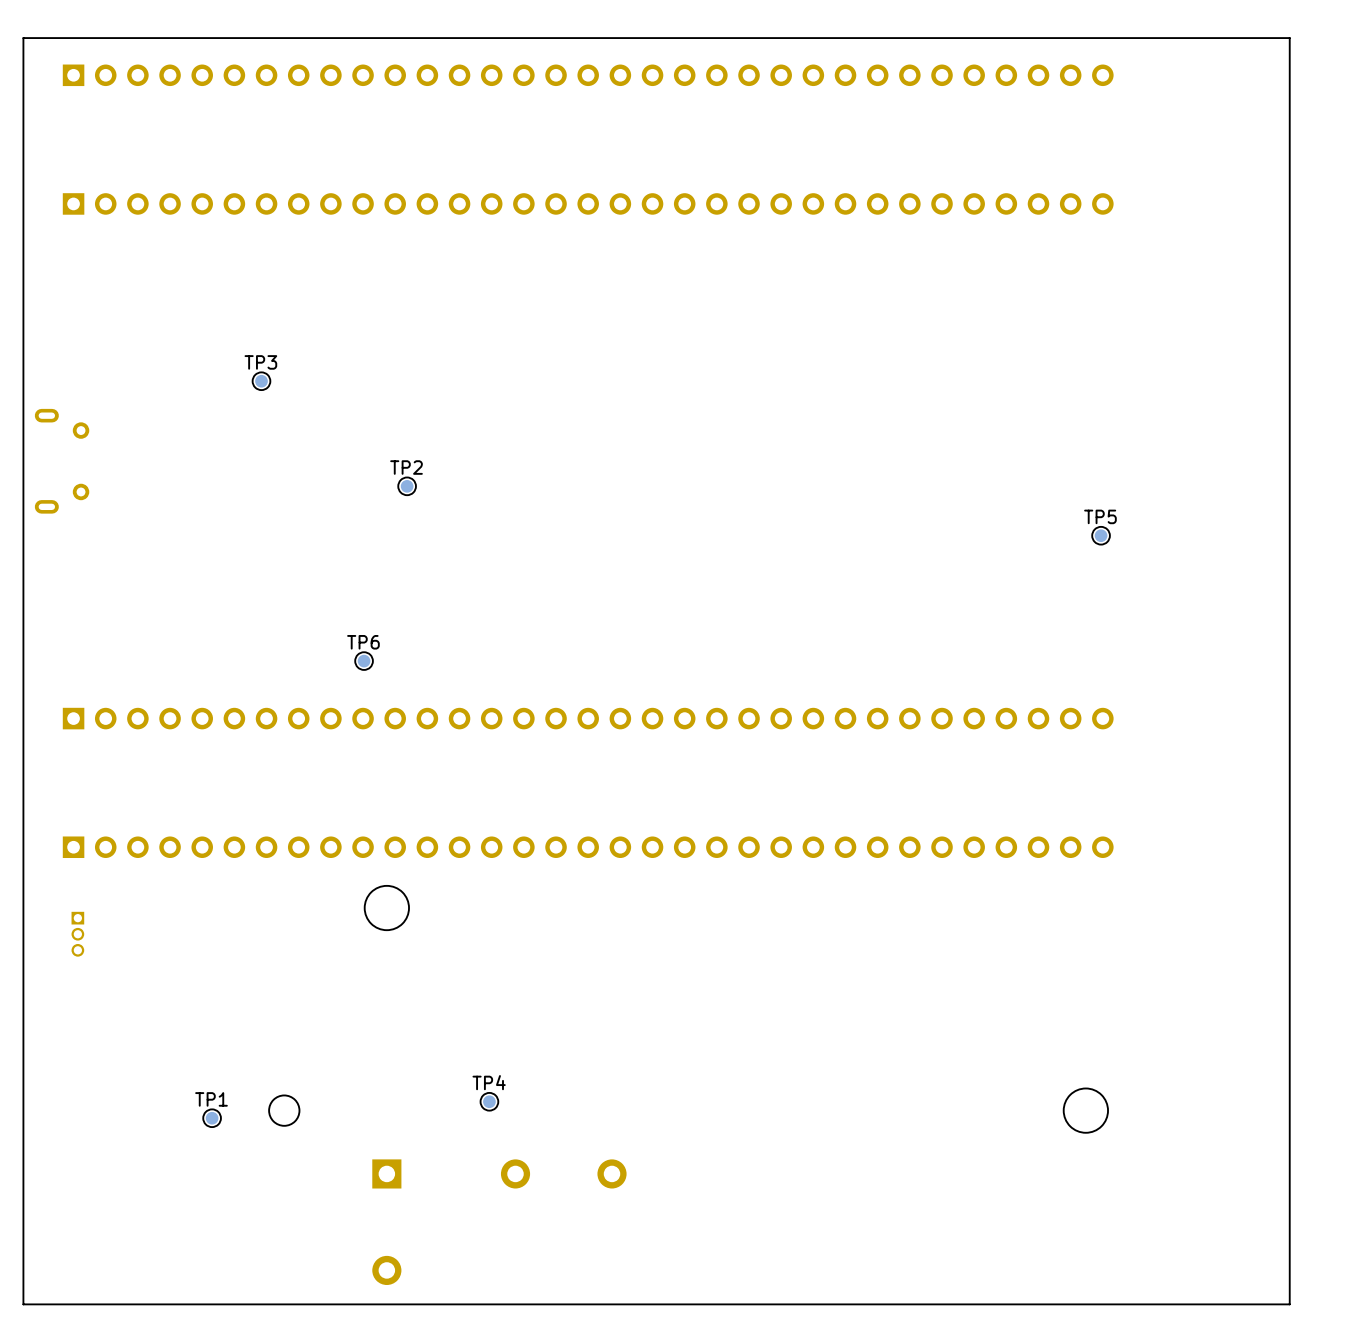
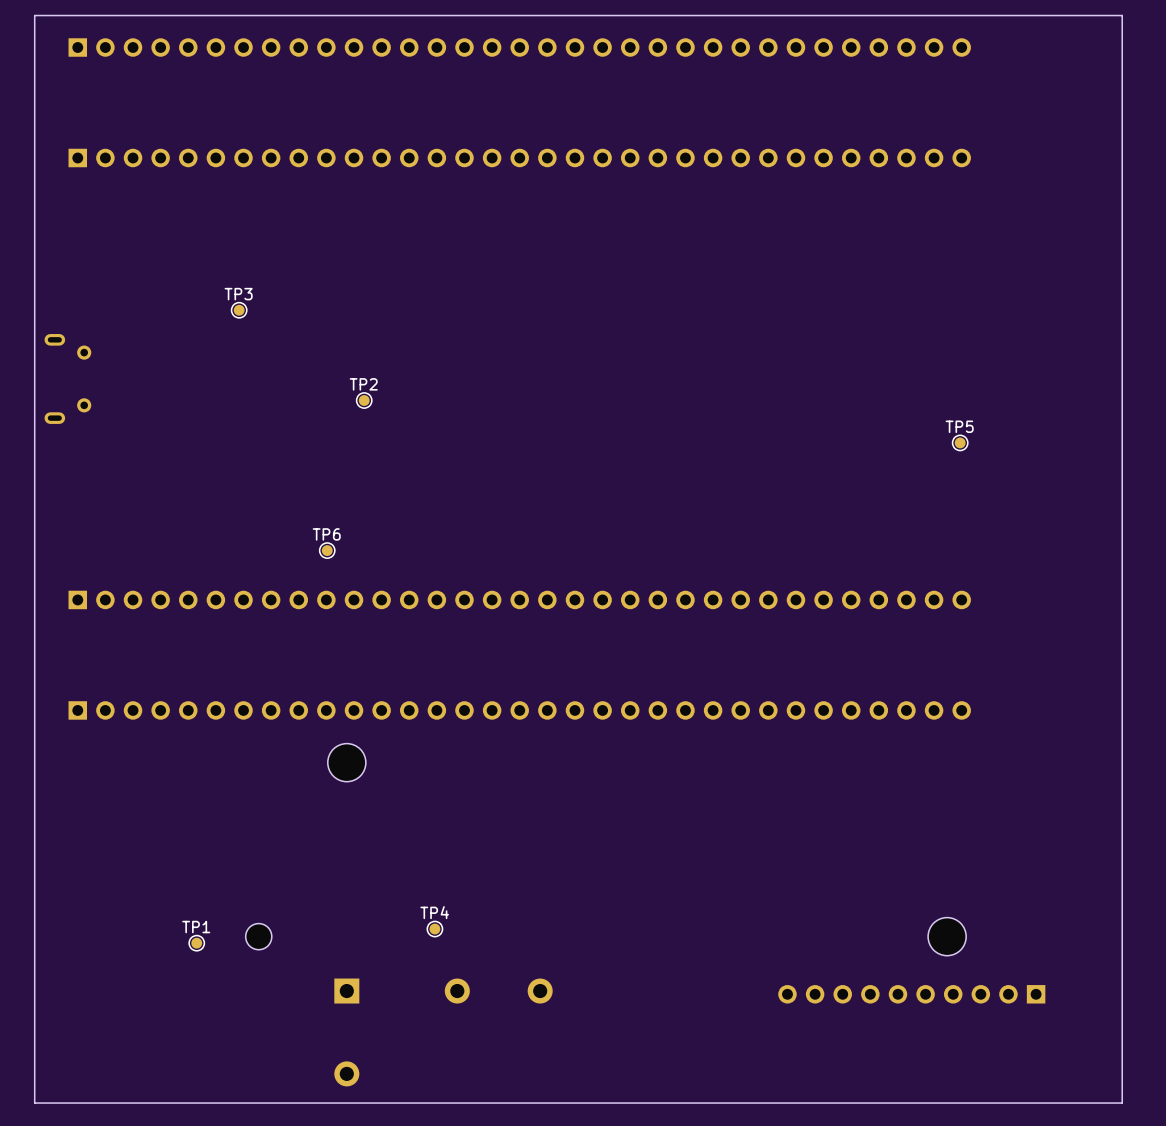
part: (77, 934) -> none
part: none -> (911, 994)

